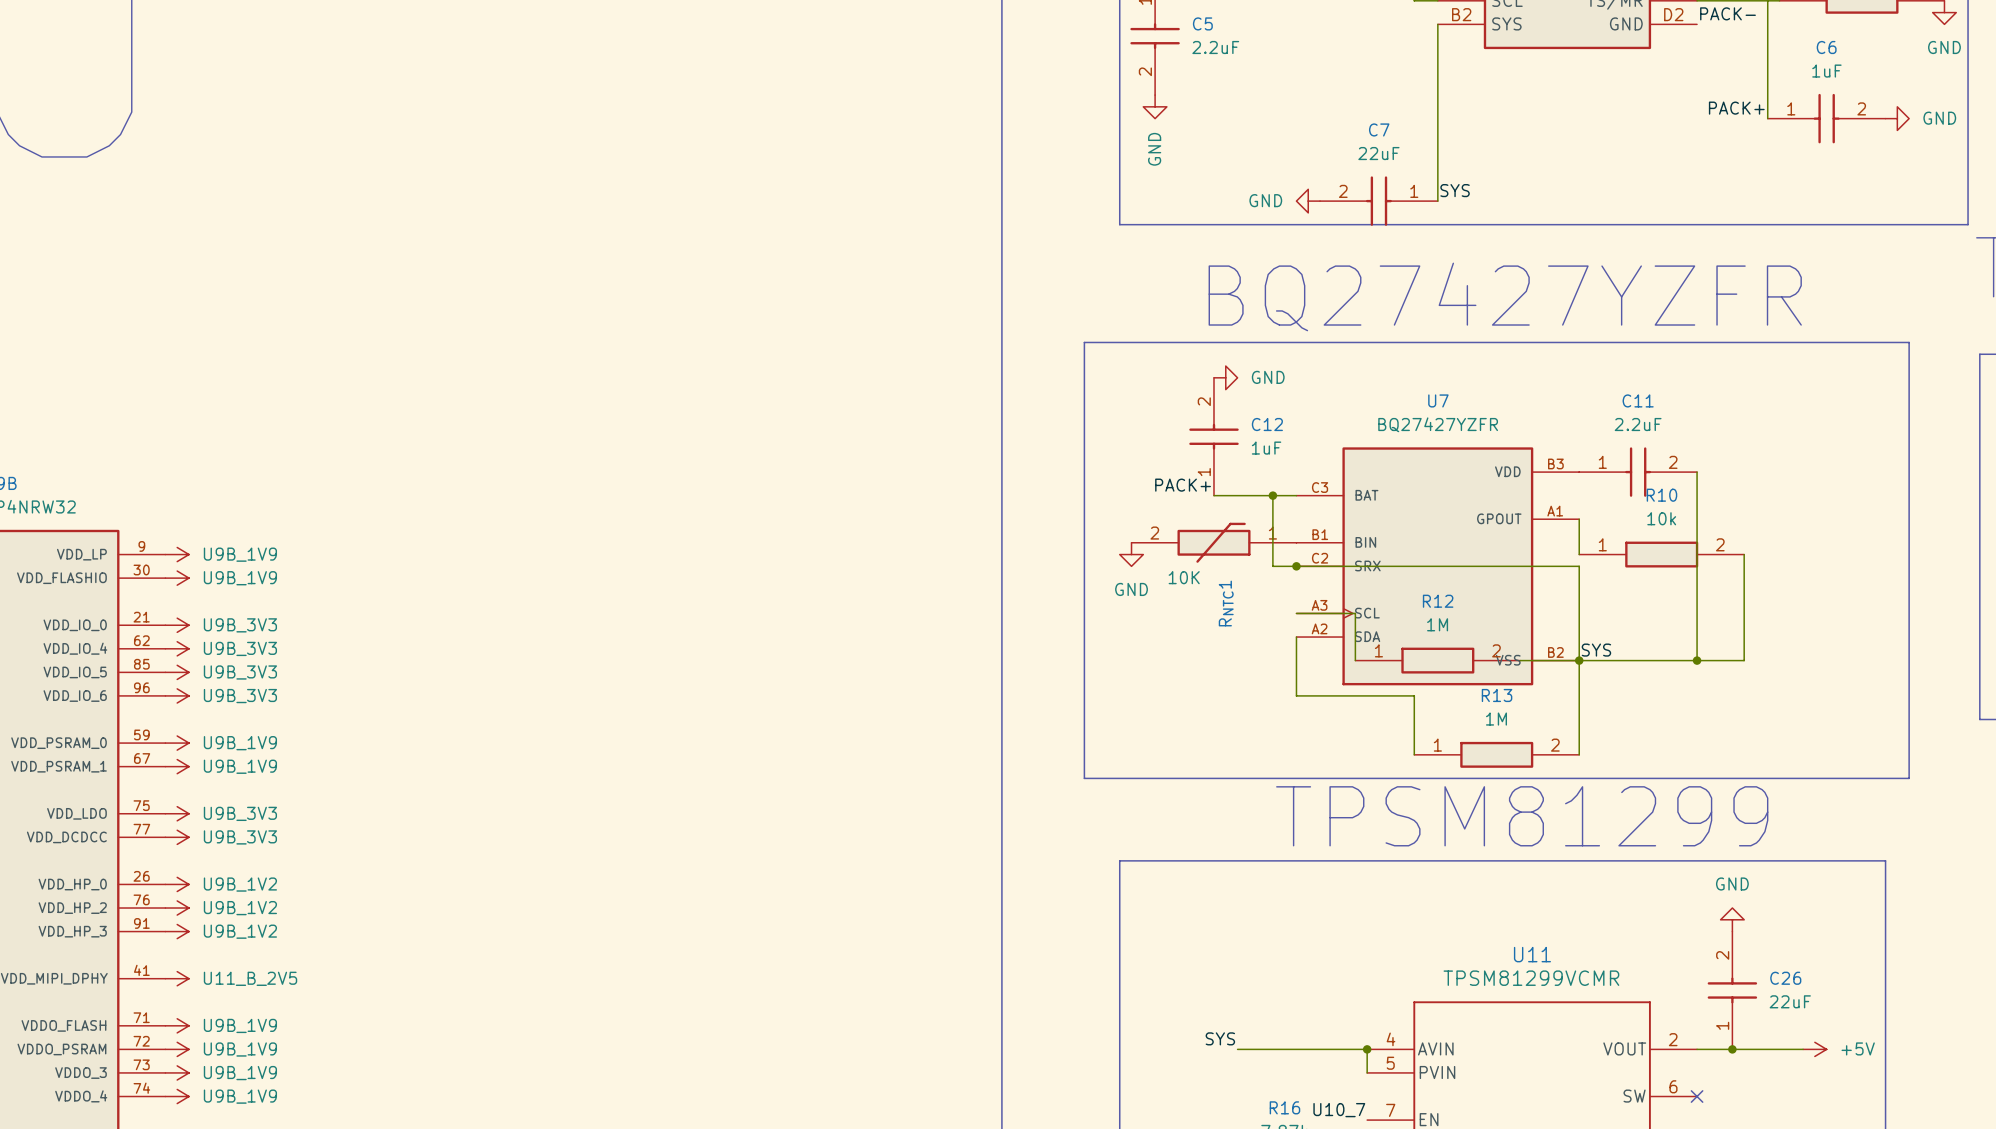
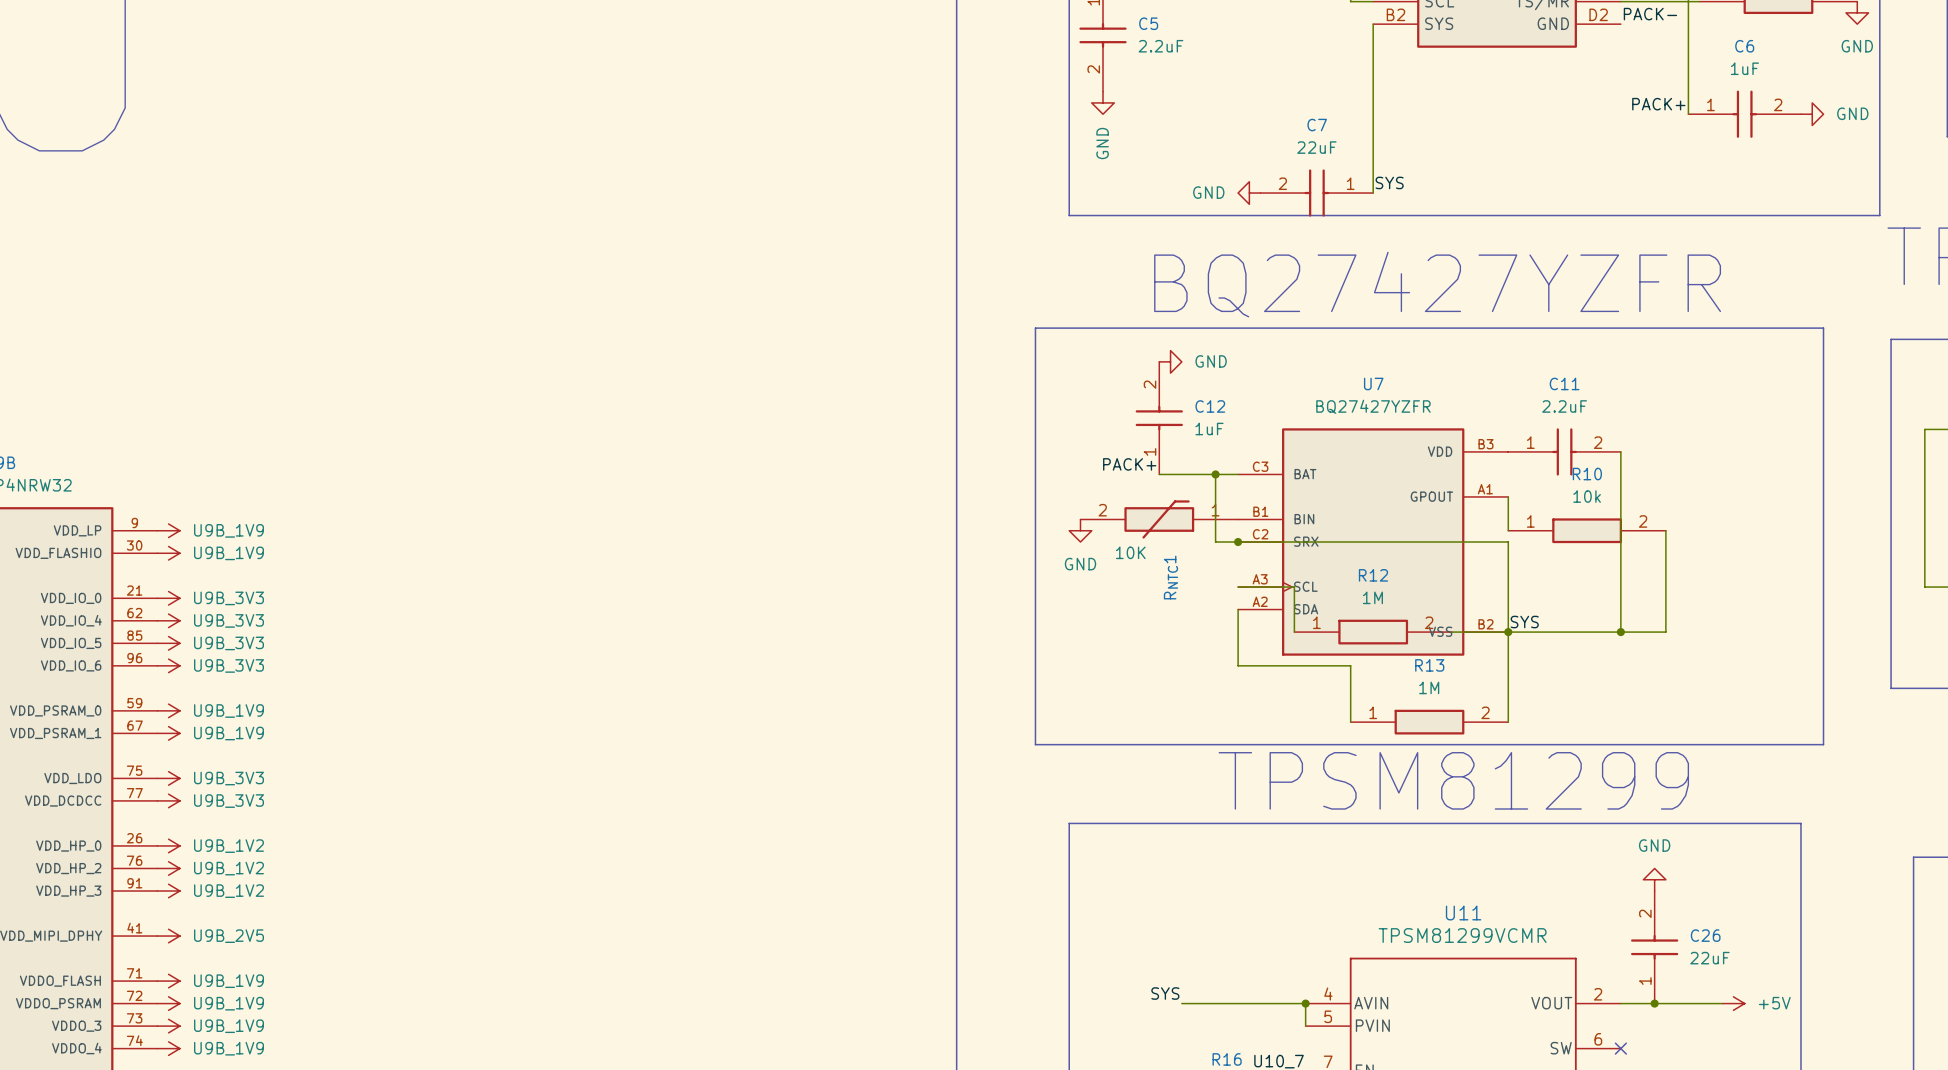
power symbol: U11_B_2V5 (177, 978) -> U9B_2V5 (168, 936)

